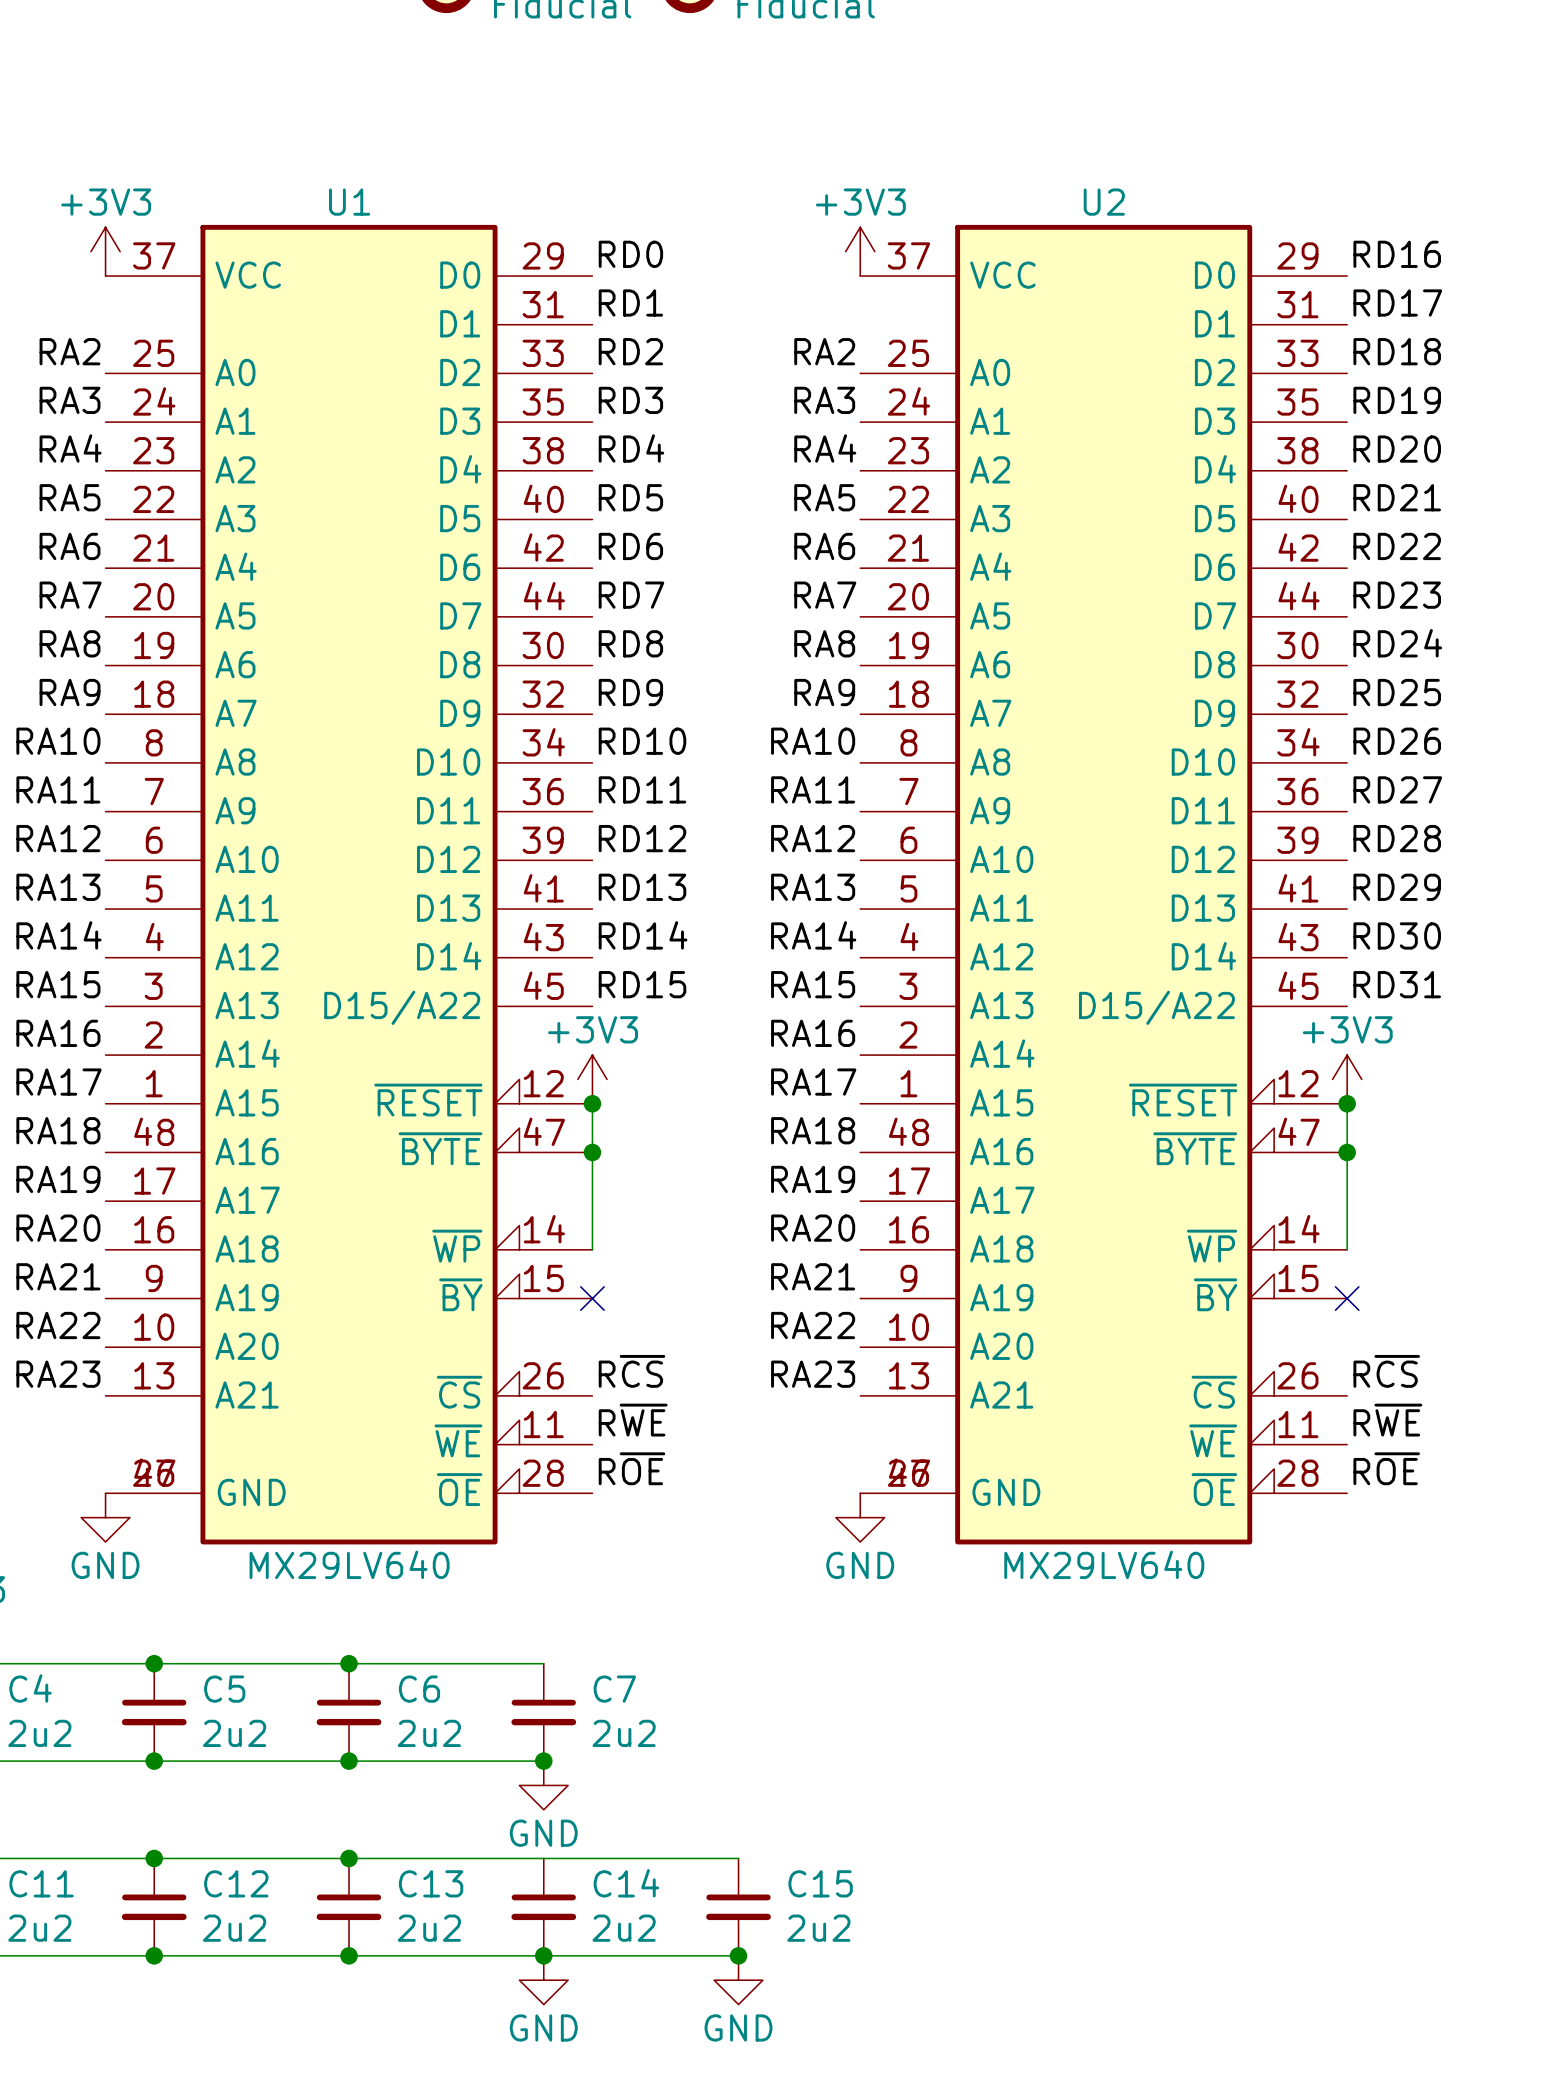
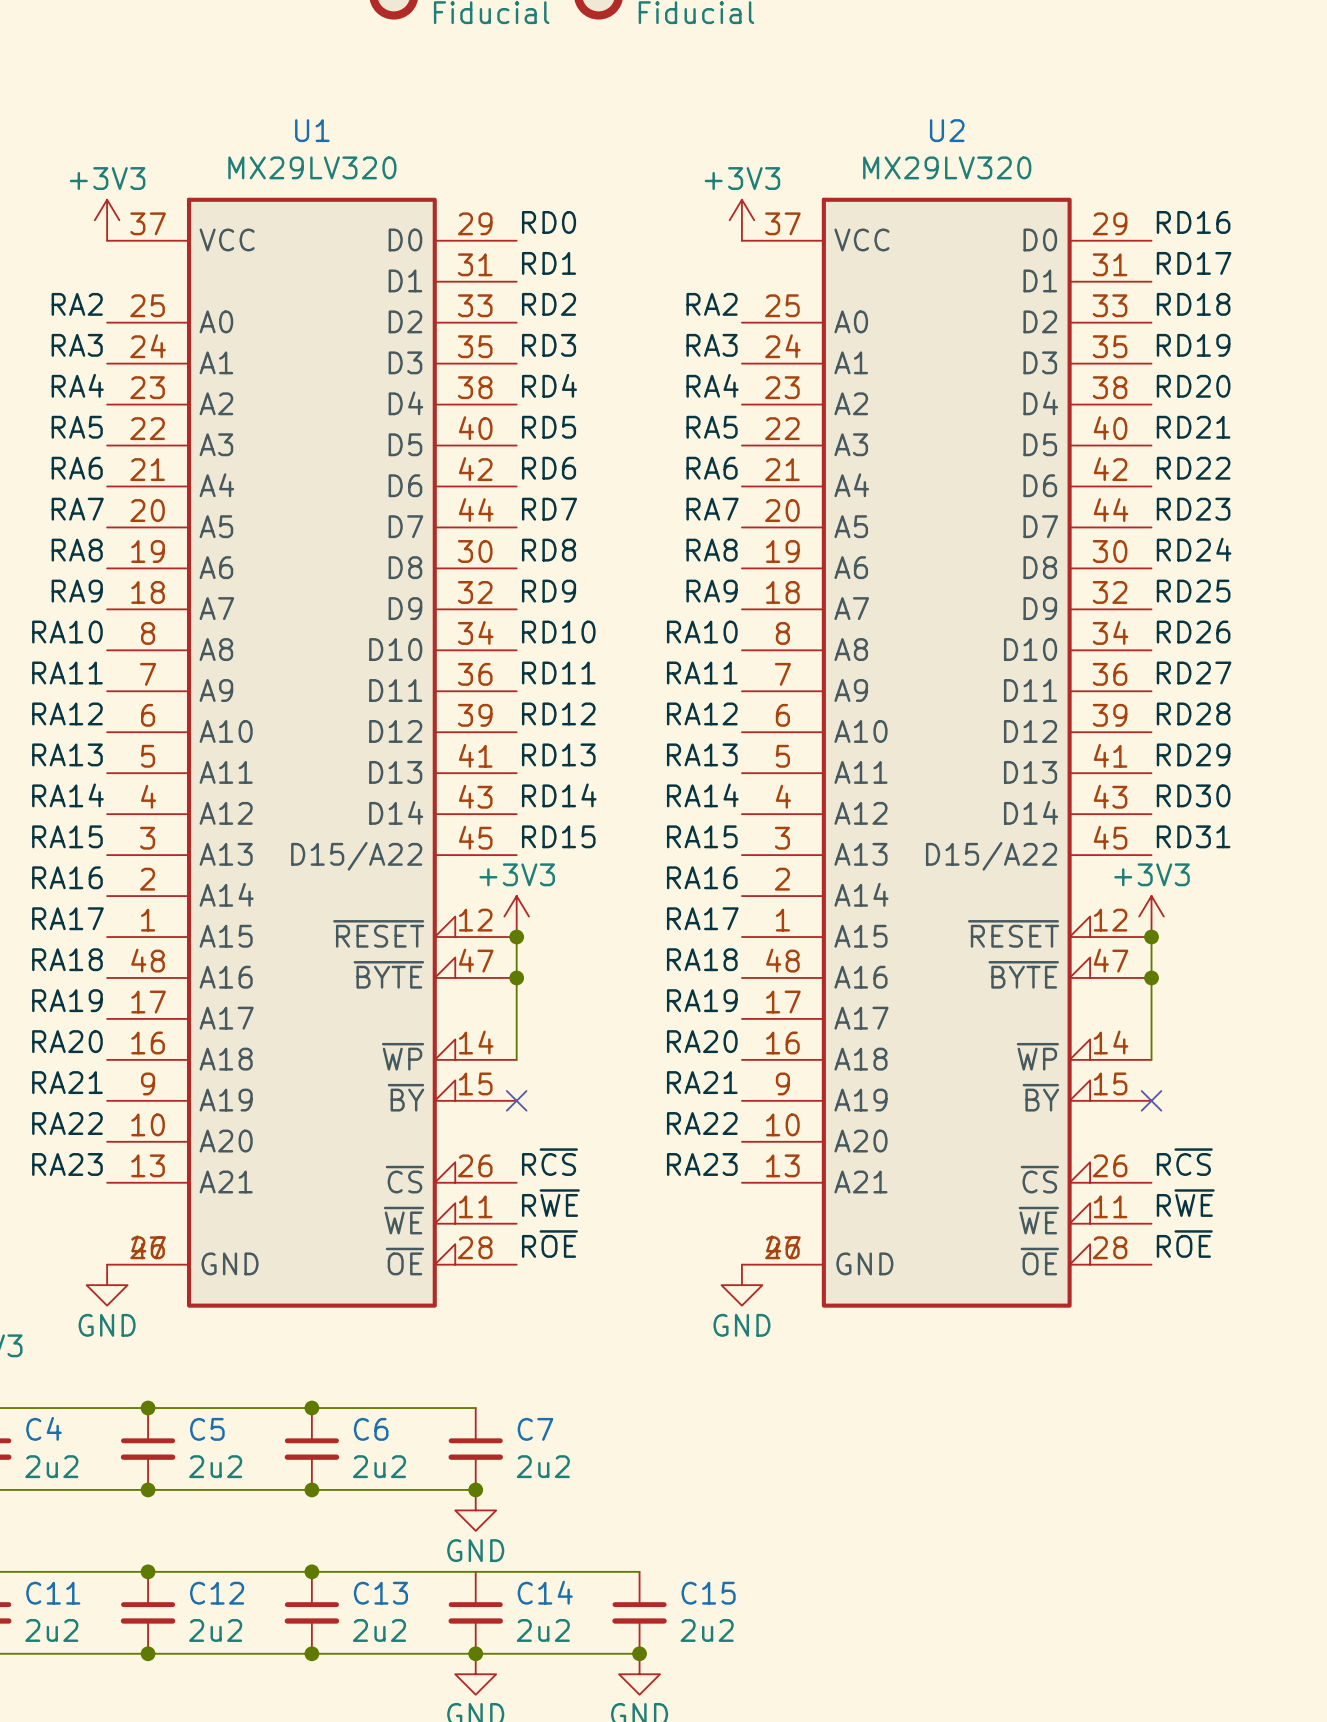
U1 name position: U1 (349, 202) -> U1 (312, 130)
U2 name position: U2 (1104, 202) -> U2 (947, 130)
U1 value: MX29LV640 (349, 1564) -> MX29LV320 (312, 167)
U2 value: MX29LV640 (1104, 1564) -> MX29LV320 (947, 167)

